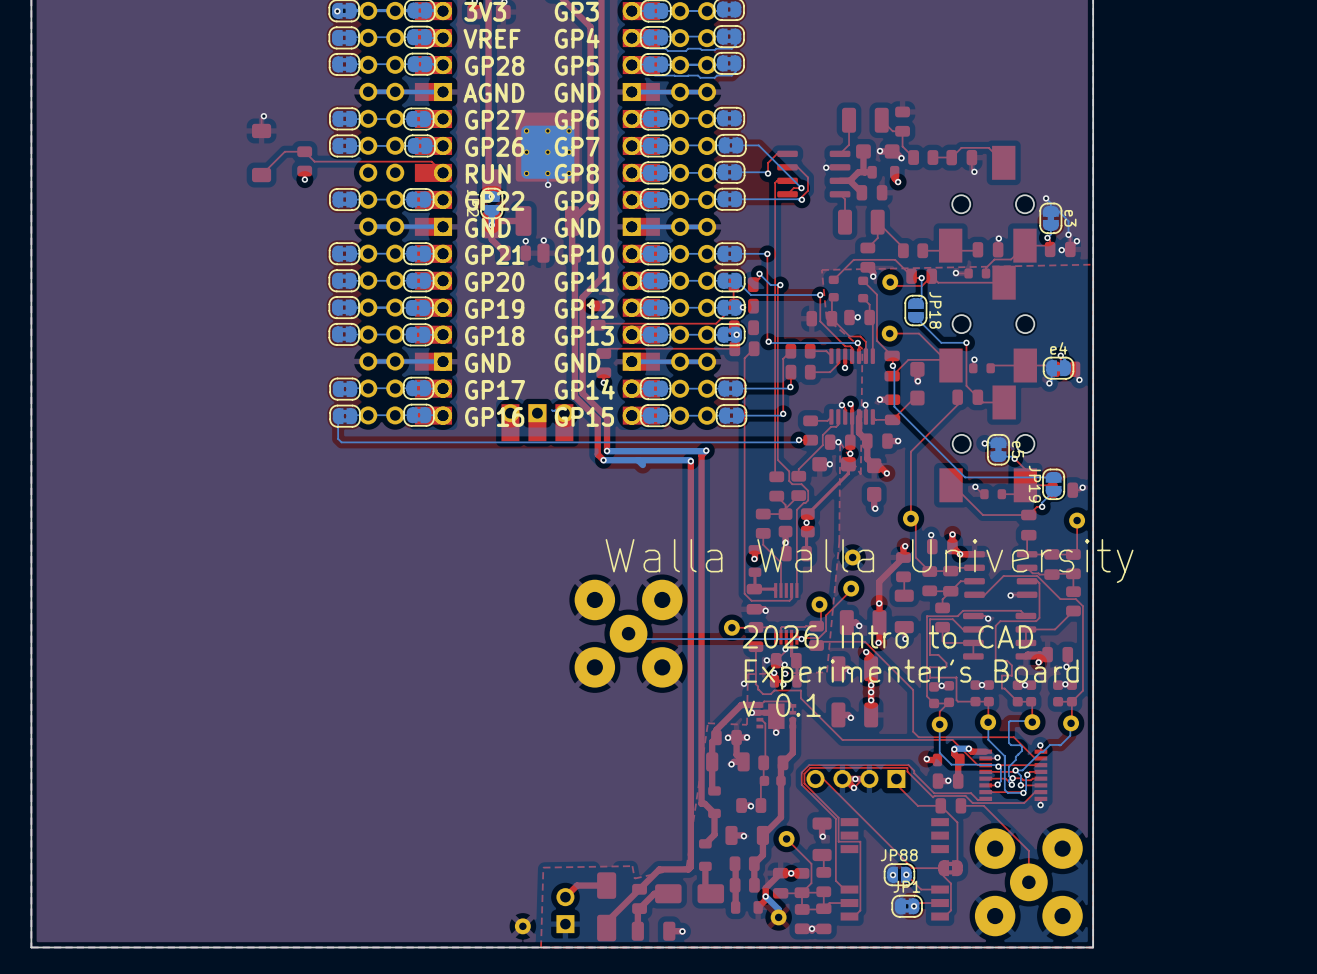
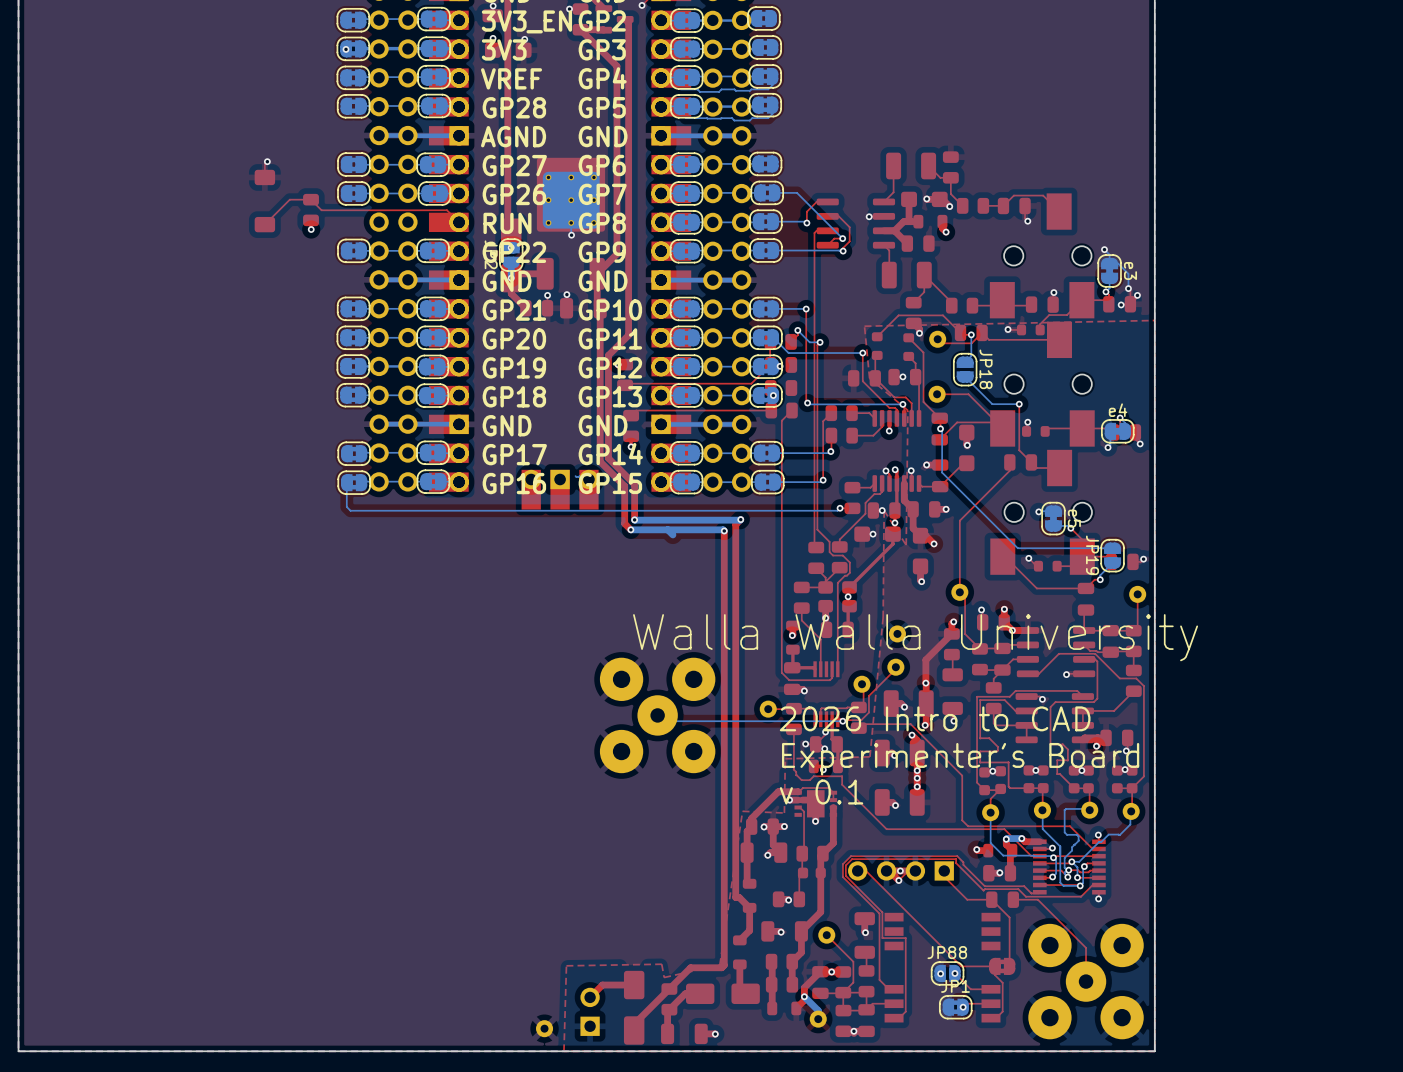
via: (774, 672) -> none
via: (785, 673) -> none
via: (744, 683) -> none

